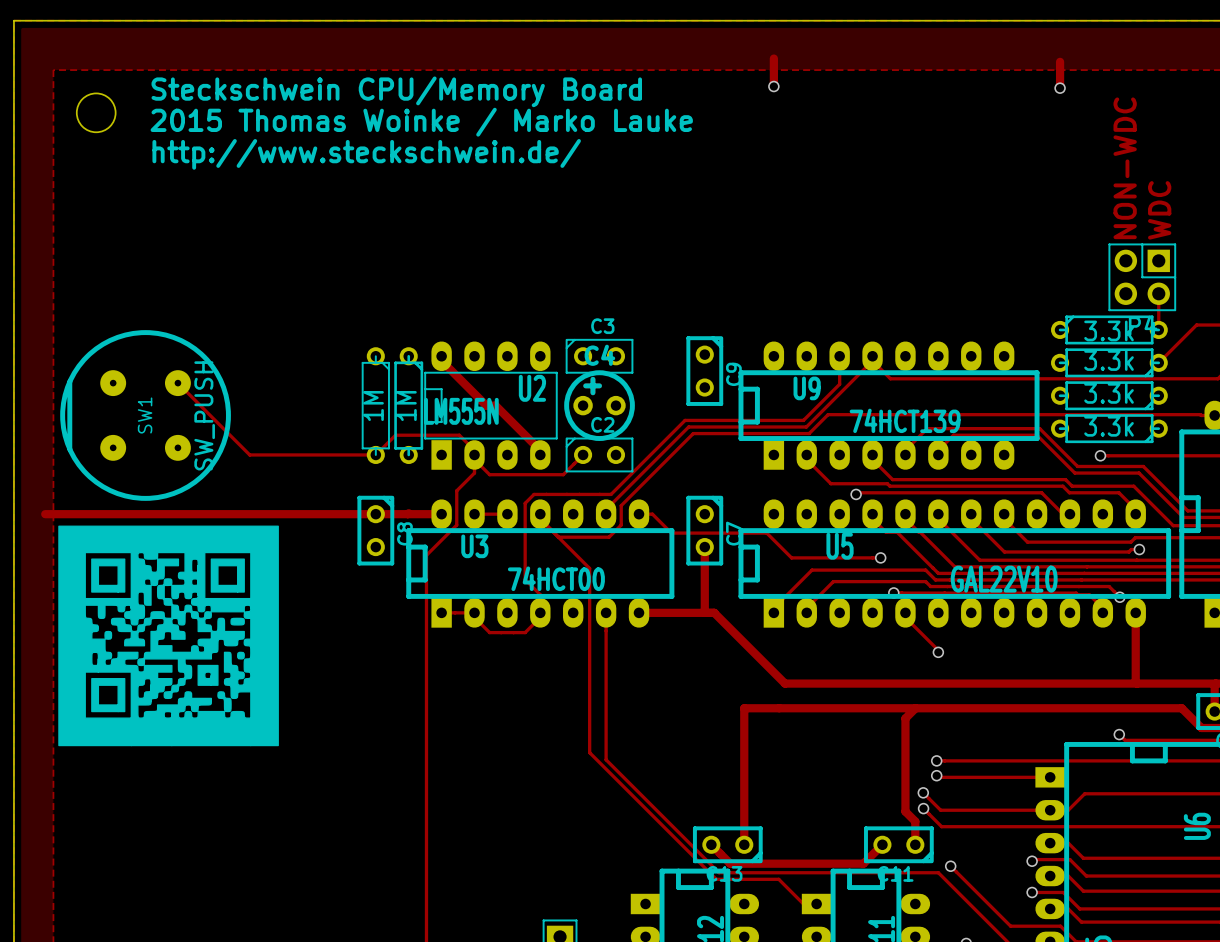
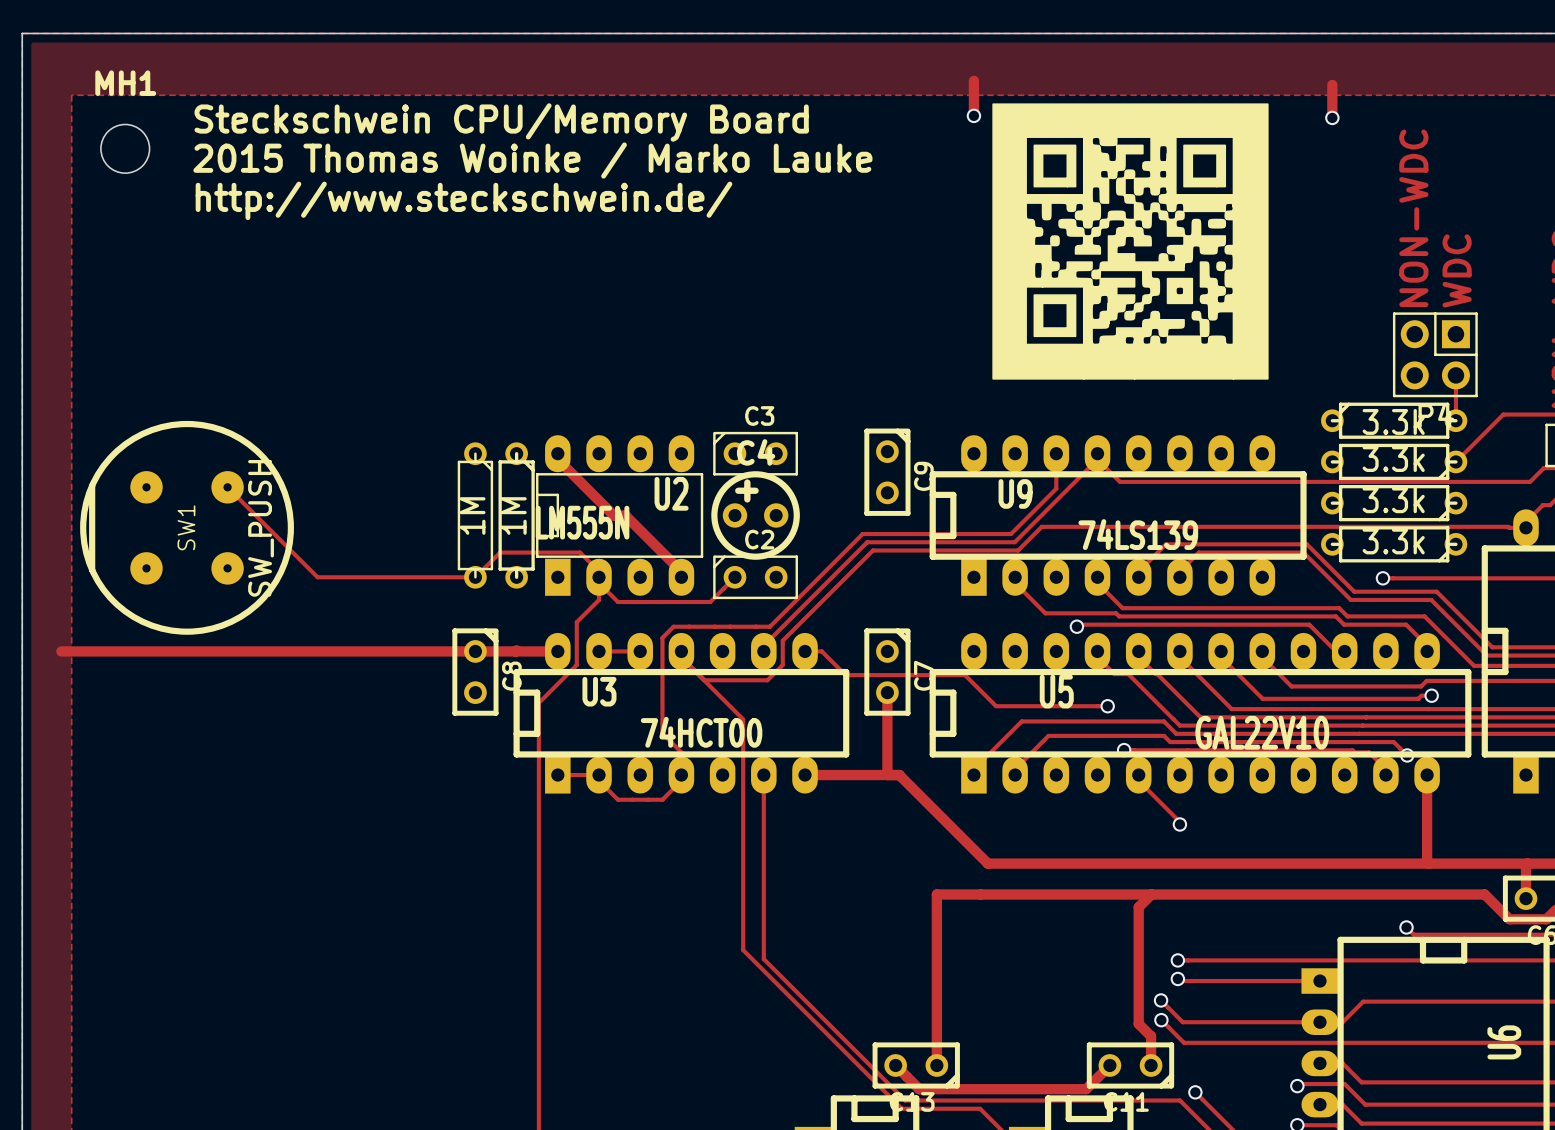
MH1 name: none -> MH1 (125, 83)
drawing: none -> [992, 103, 1269, 380]
U9 value: 74HCT139 (905, 420) -> 74LS139 (1138, 534)
drawing: [58, 525, 279, 747] -> none

